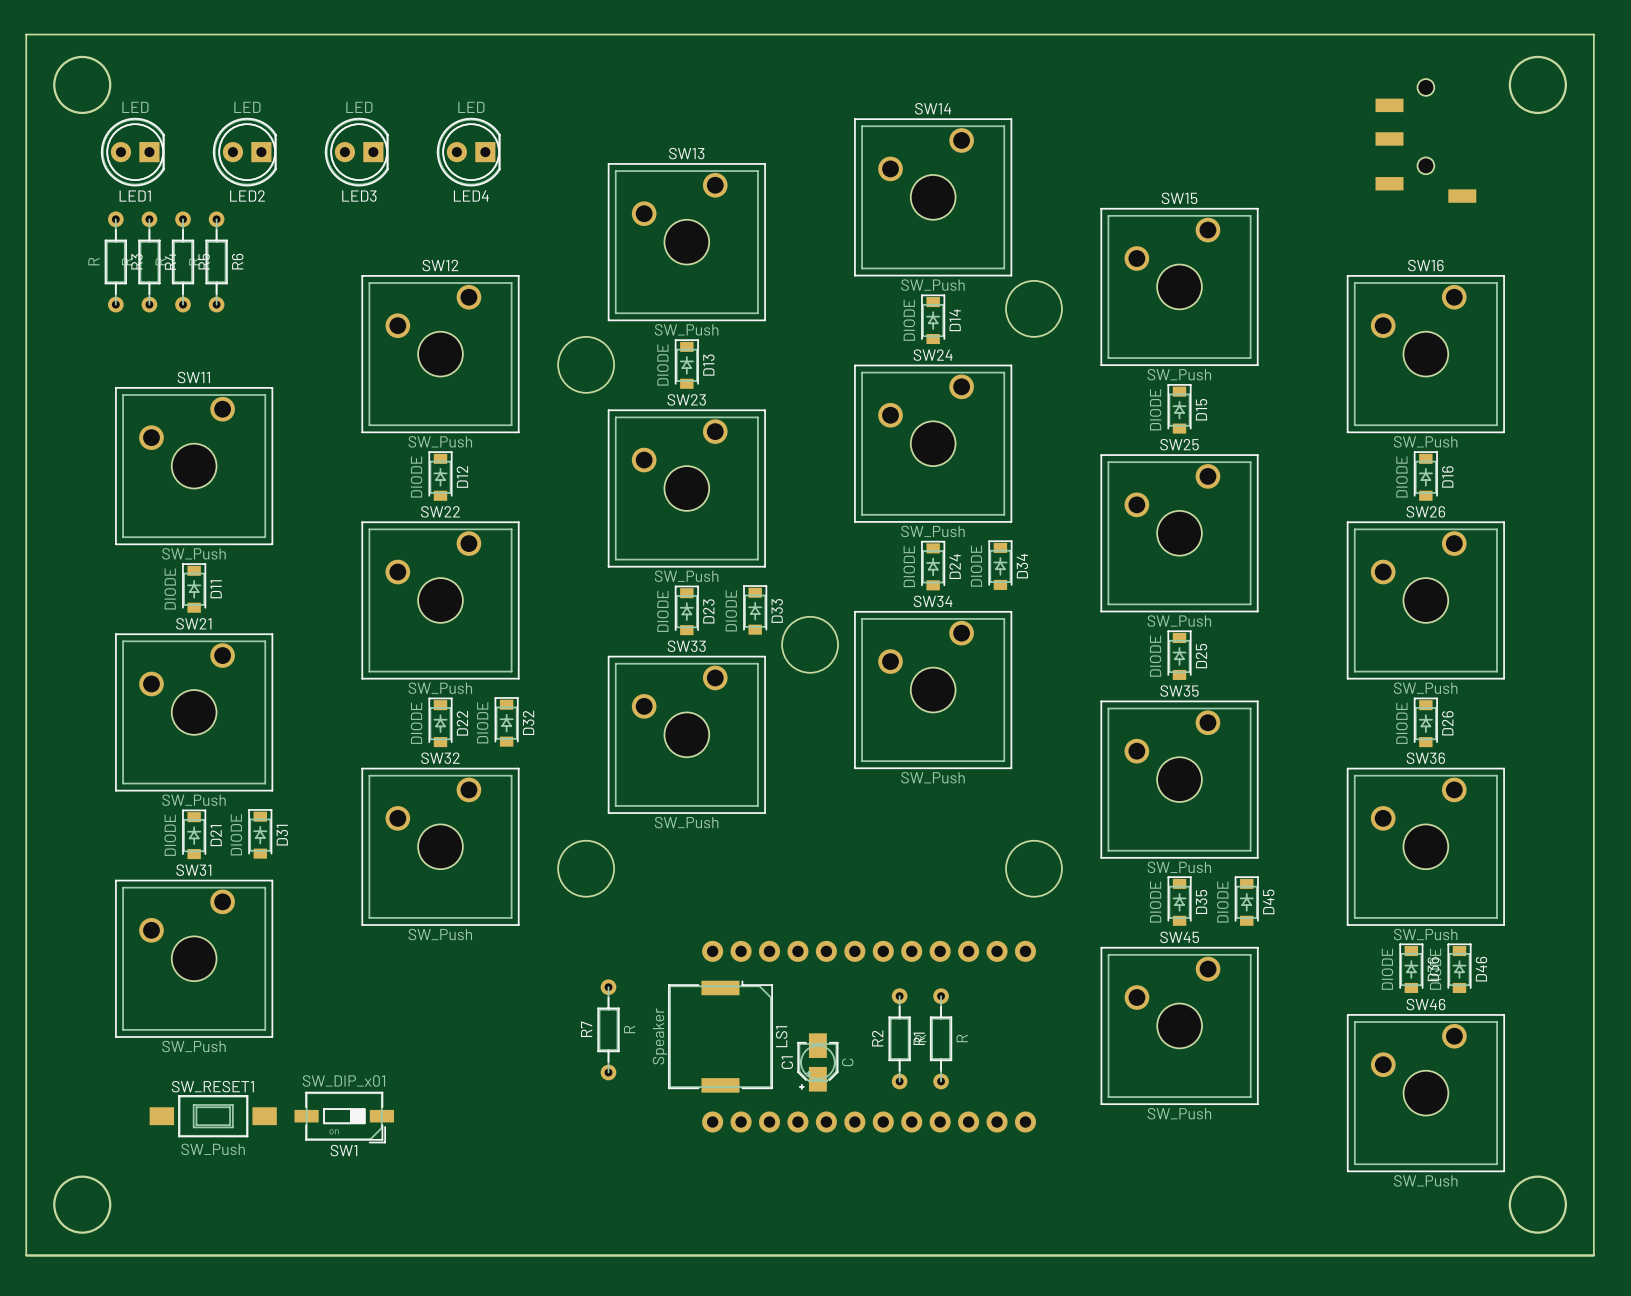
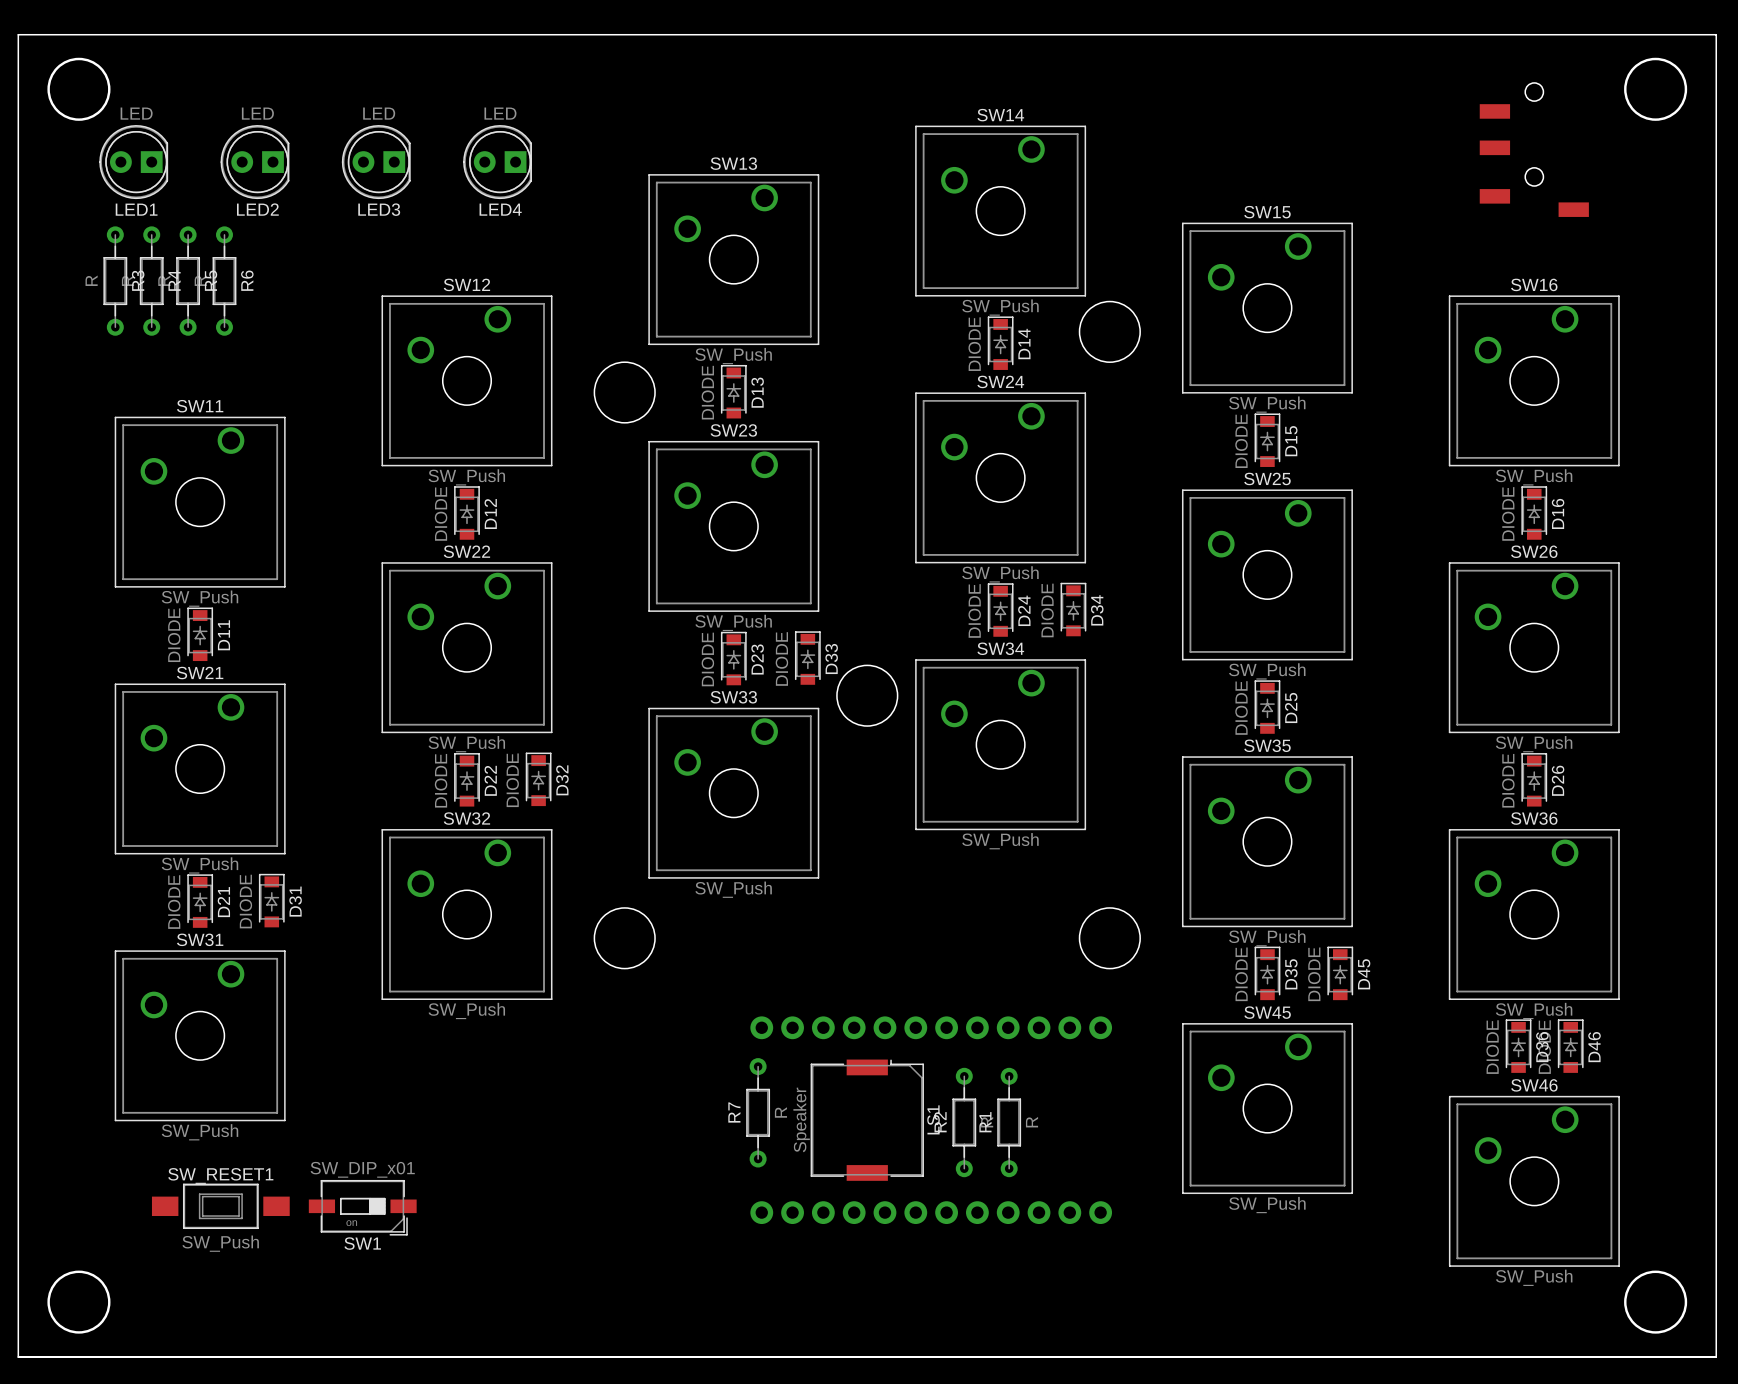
R7 position: (608, 1029) -> (758, 1112)
LS1 position: (720, 1036) -> (867, 1120)
C1: C (817, 1062) -> none

